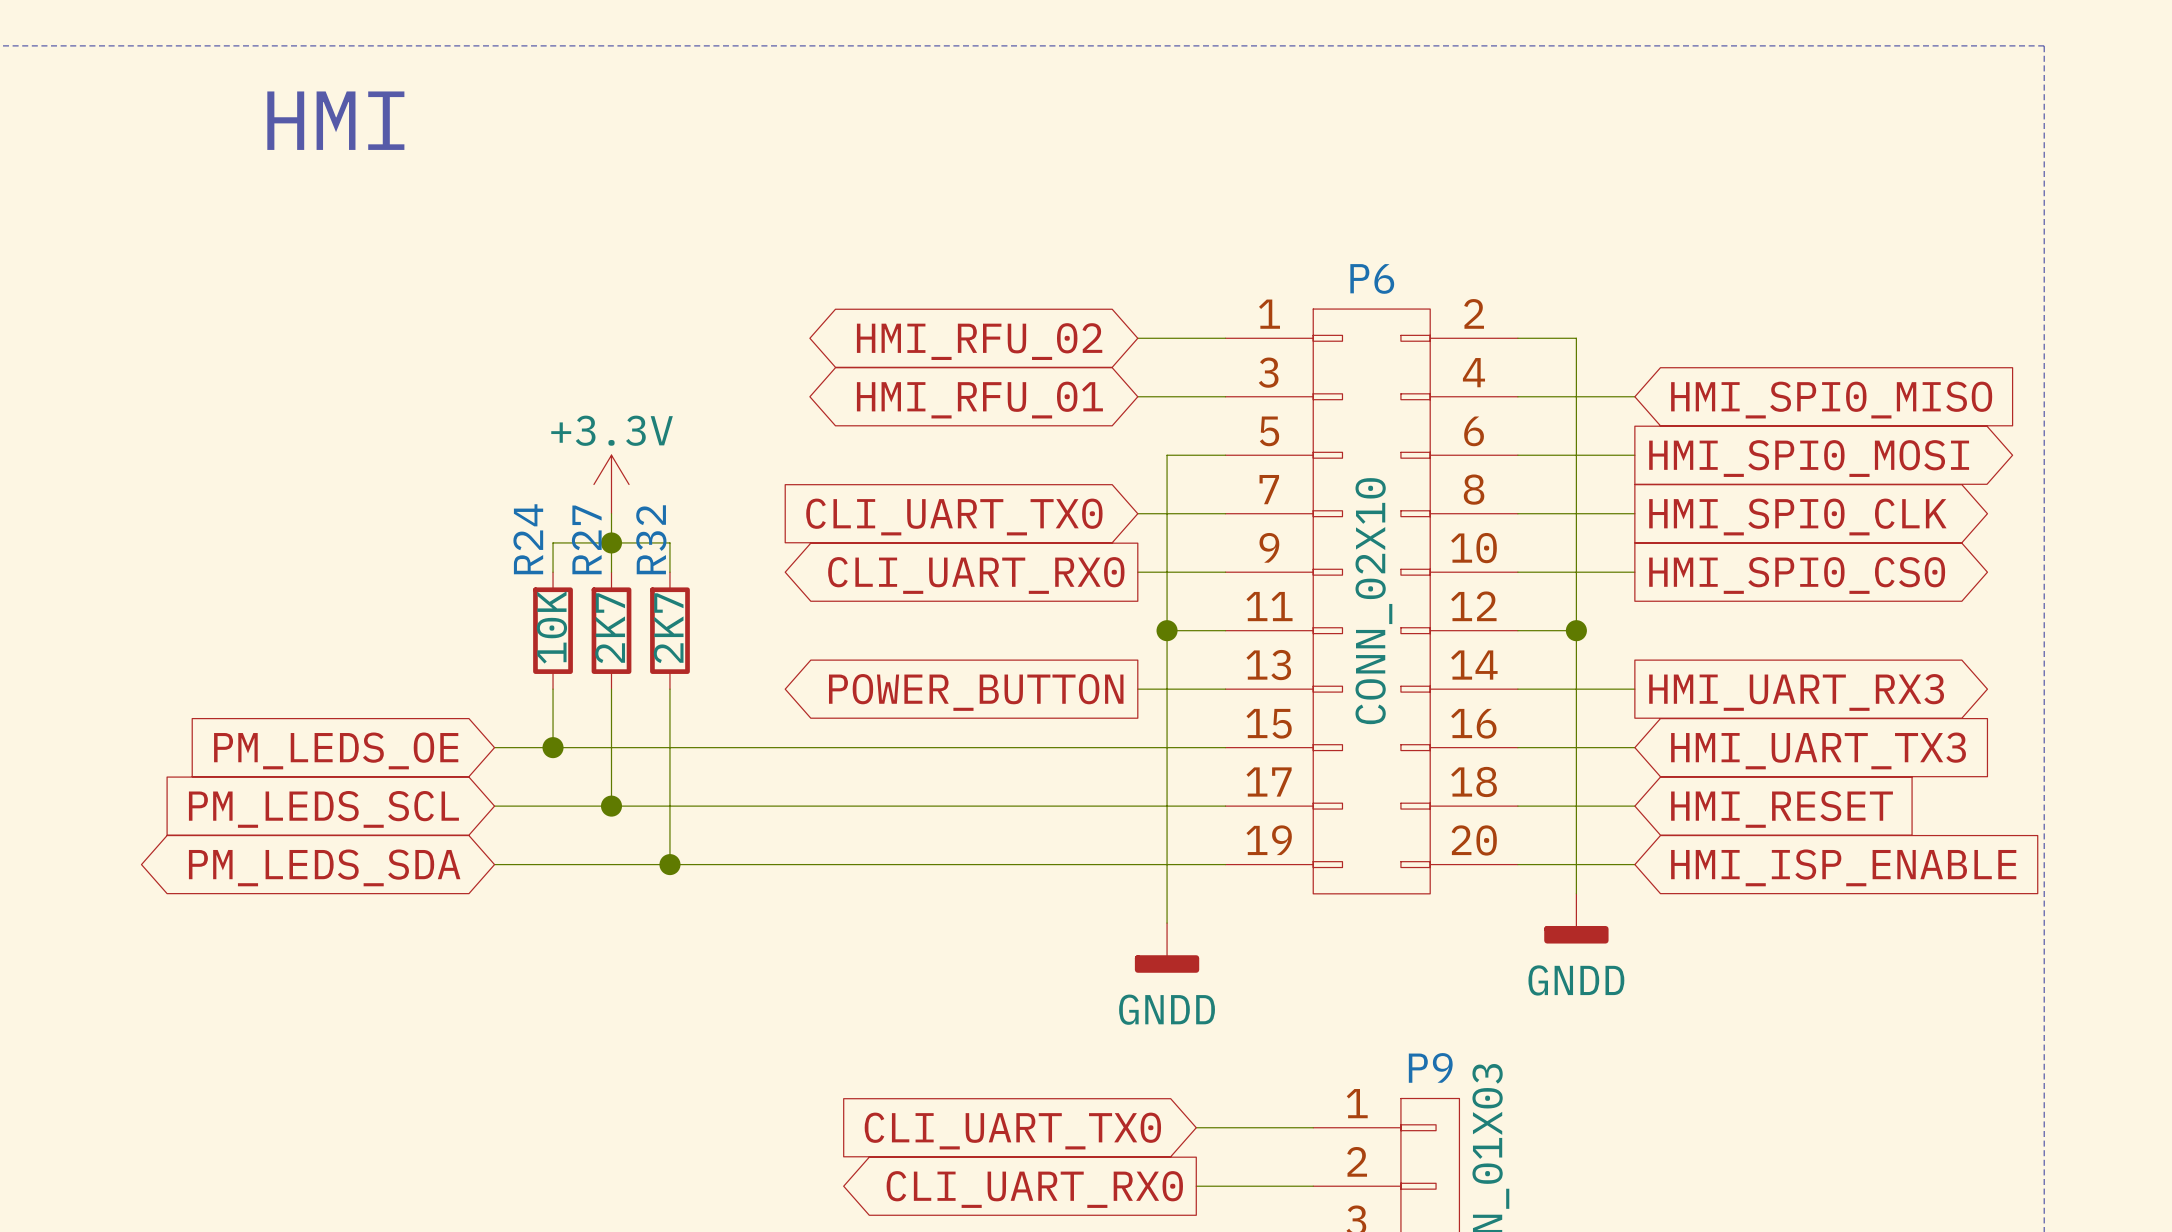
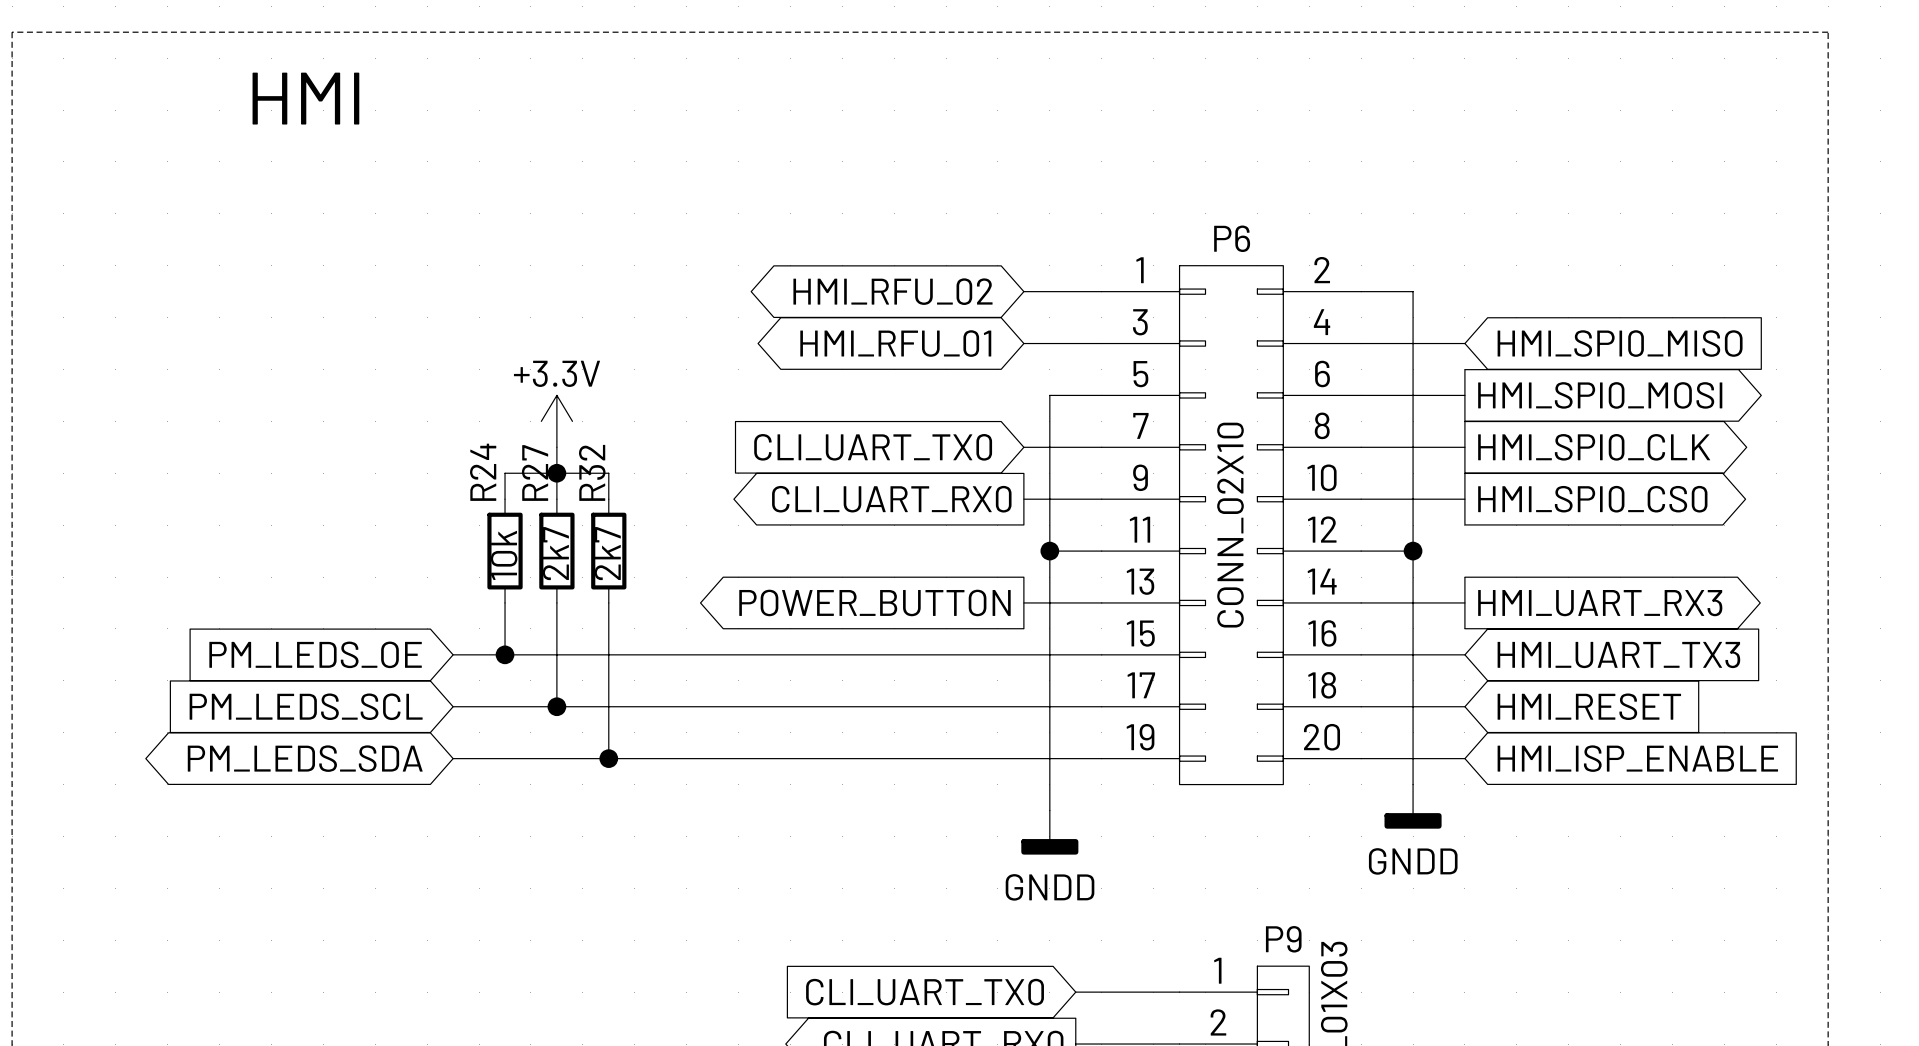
R24 value: 10K (551, 627) -> 10k (504, 555)
R27 value: 2K7 (610, 628) -> 2k7 (555, 553)
R32 value: 2K7 (668, 628) -> 2k7 (607, 553)

